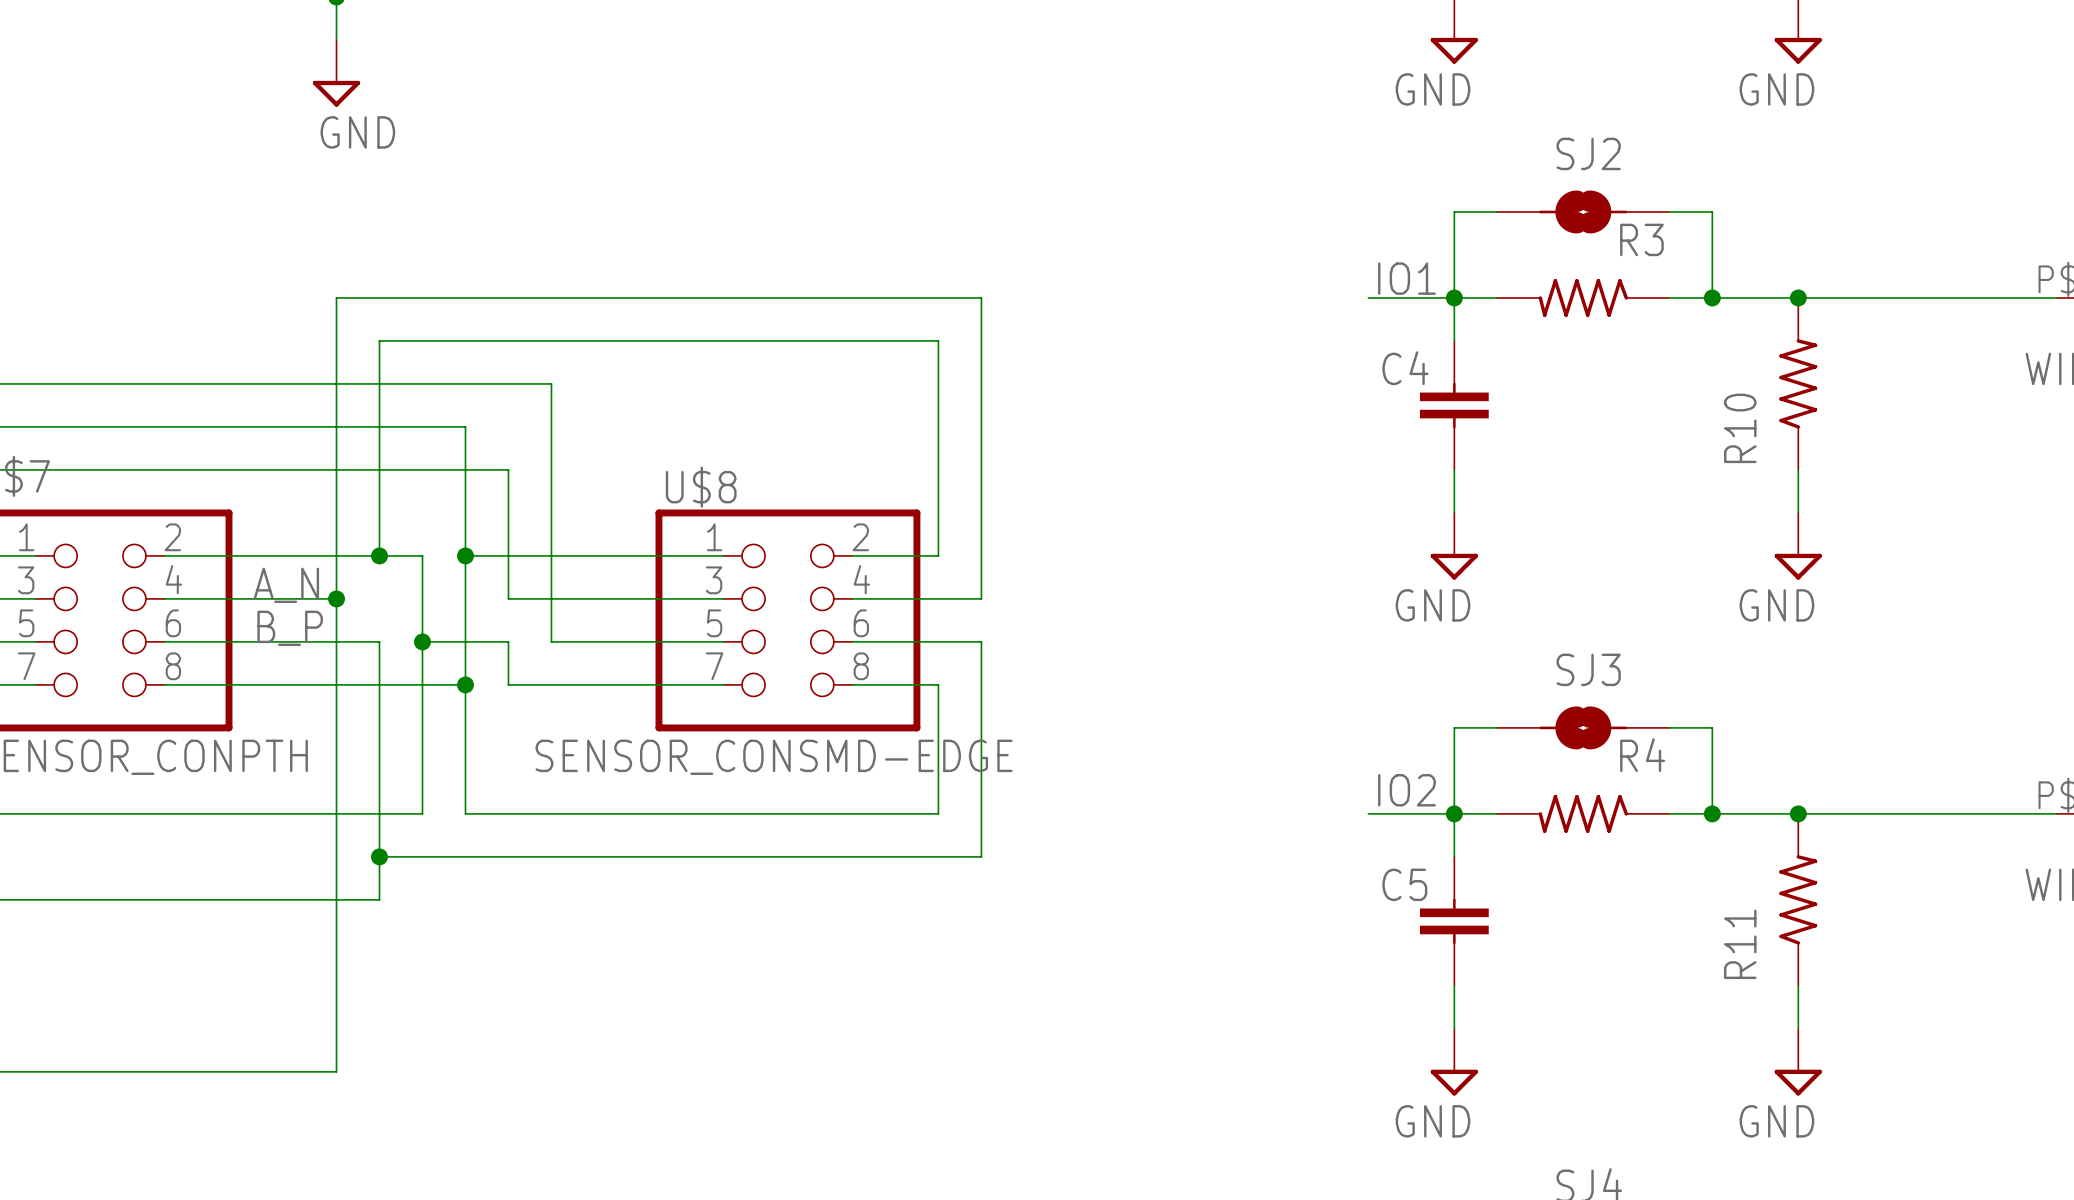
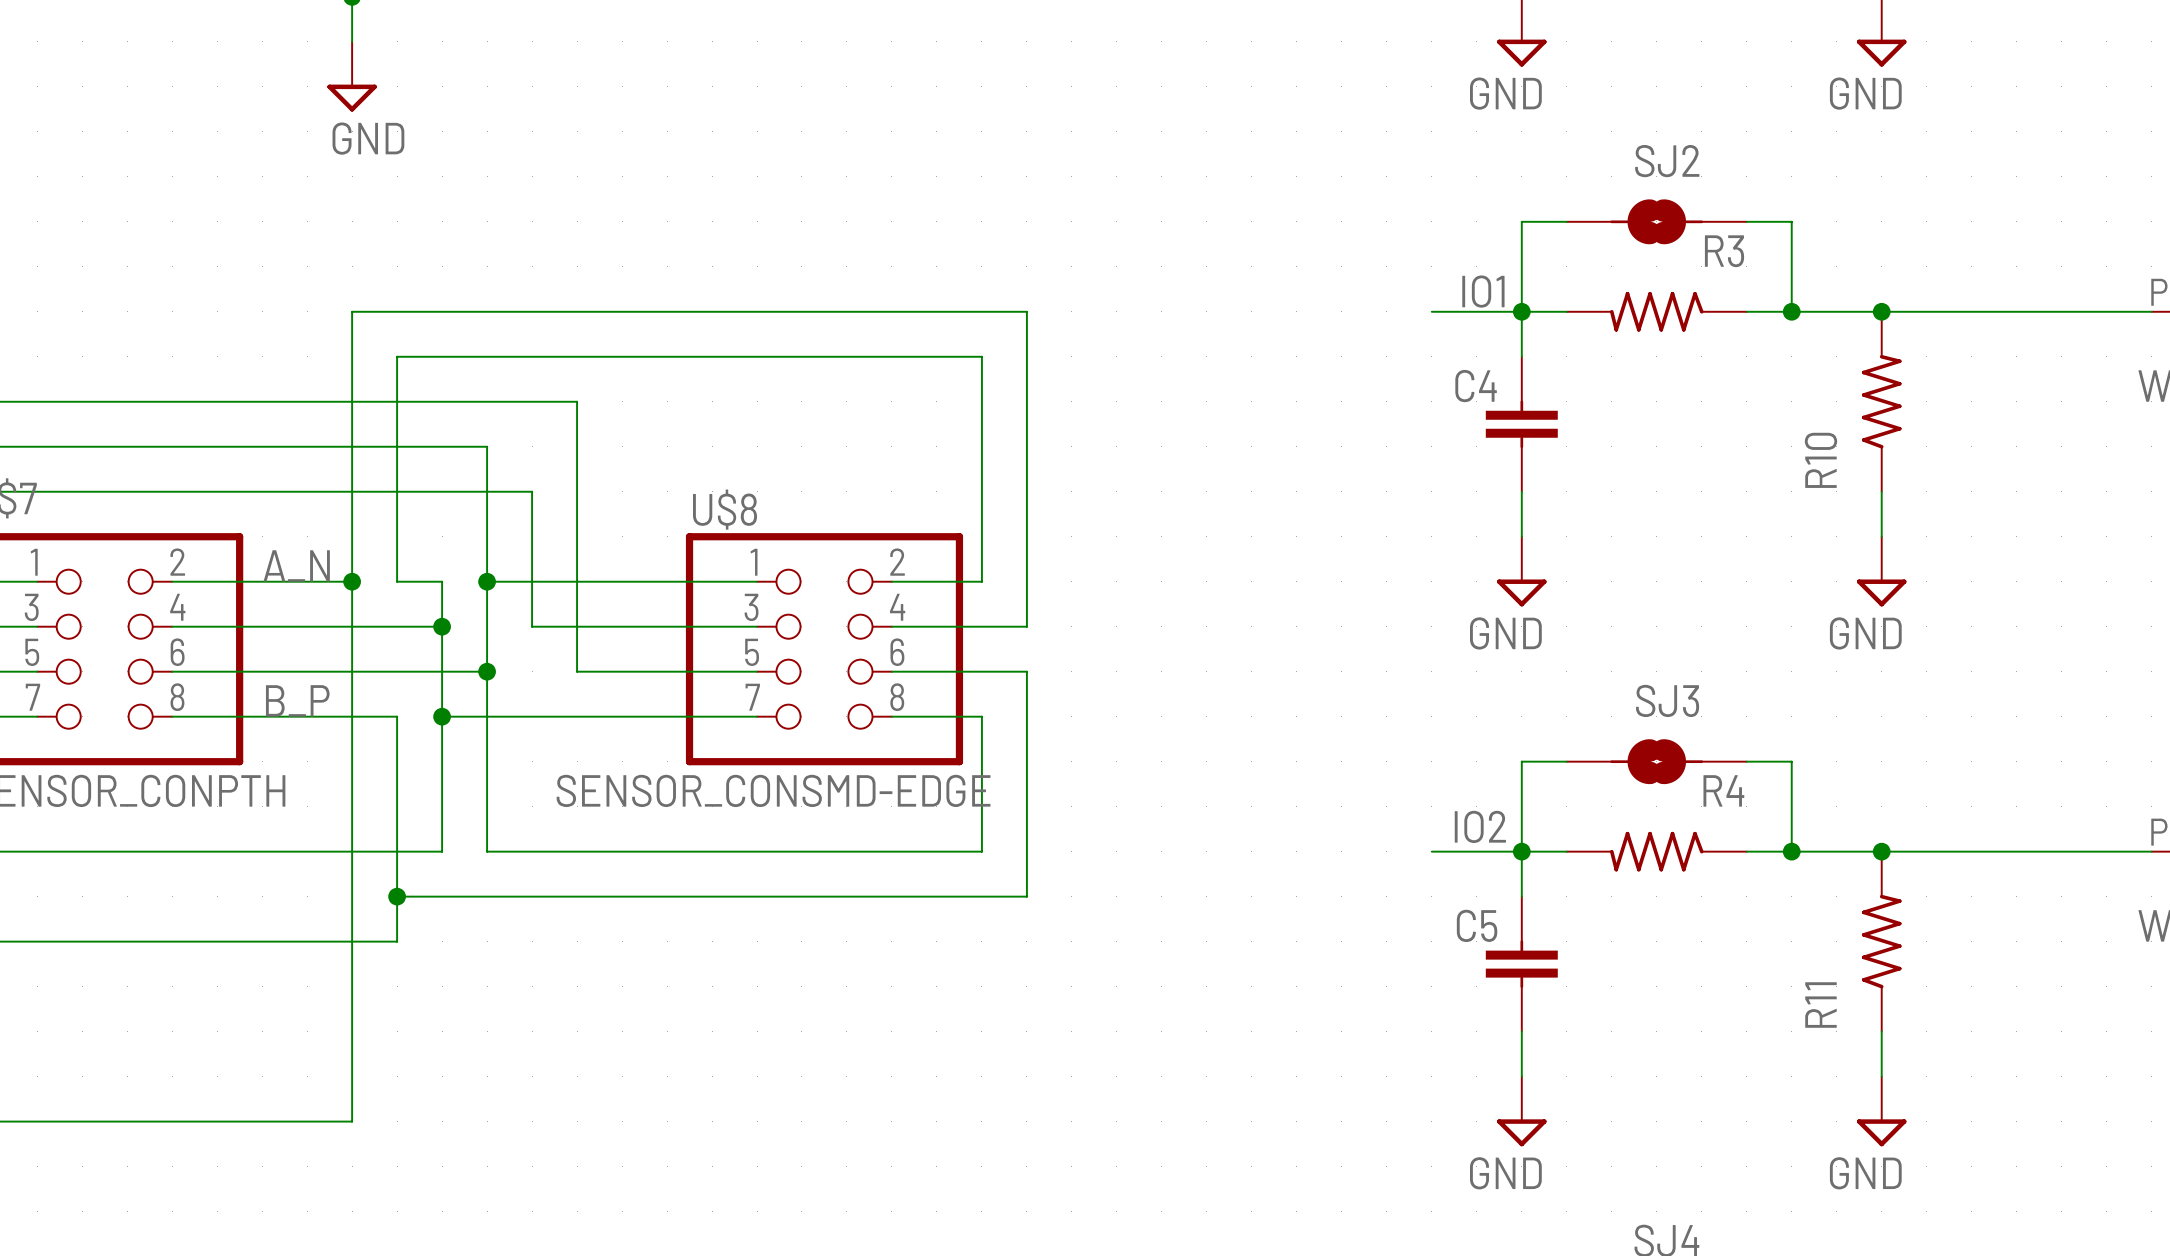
wire: (336, 555) (379, 555) -> none
junction: none -> (352, 581)
junction: (379, 555) -> none
label position: A_N (286, 585) -> A_N (296, 565)
wire: none -> (352, 626) (442, 626)
junction: (336, 598) -> none
junction: none -> (442, 626)
label position: B_P (290, 628) -> B_P (297, 700)
wire: (379, 641) (379, 684) (422, 684) -> (397, 671) (442, 671)
junction: (422, 641) -> none
wire: (465, 641) (508, 641) (508, 684) -> (487, 716) (532, 716)
junction: none -> (487, 671)
junction: none -> (442, 716)
junction: (465, 684) -> none

